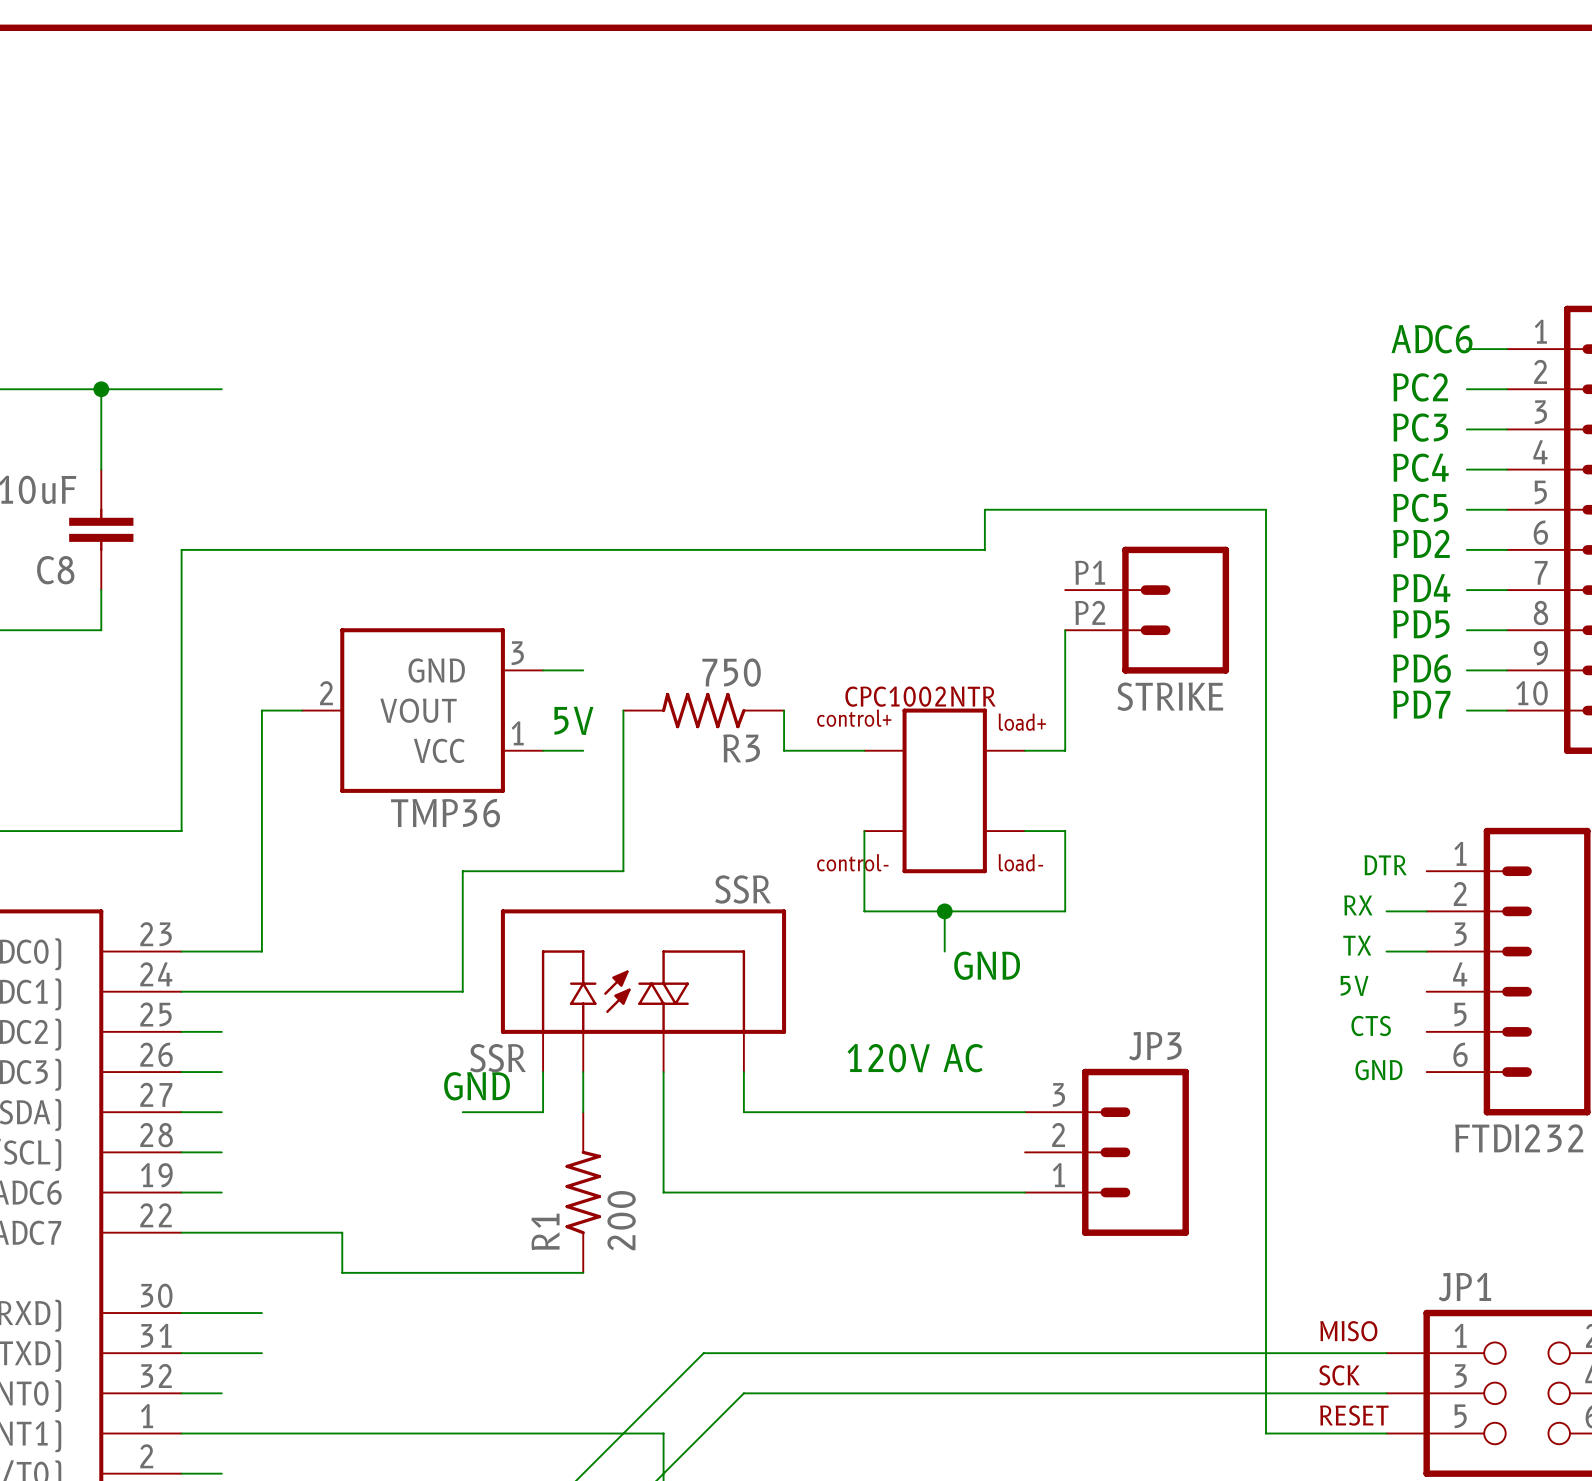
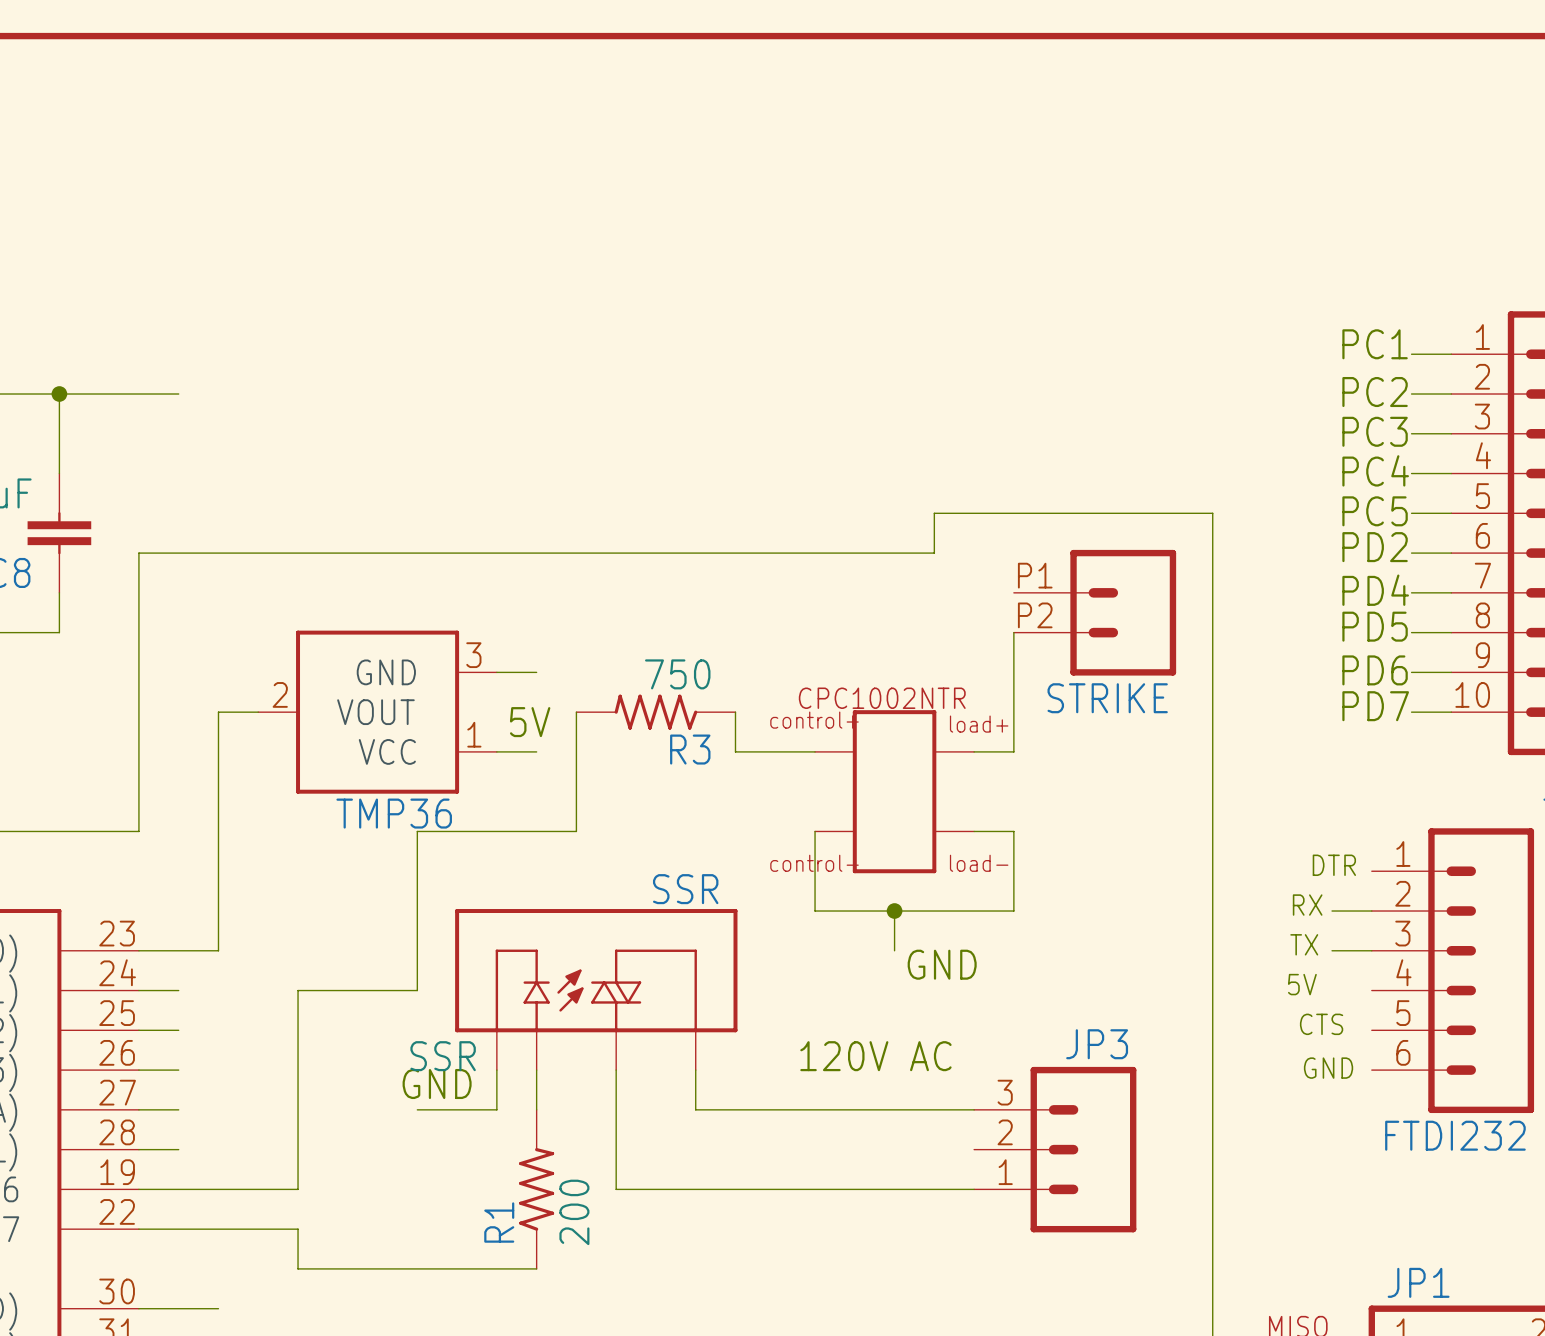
text: ADC6 (1432, 339) -> PC1 (1375, 344)
wire: (623, 831) (623, 871) (462, 871) -> (576, 831) (417, 831) (417, 871)
wire: (221, 991) (342, 991) -> (178, 1189) (298, 1189) (298, 990)

